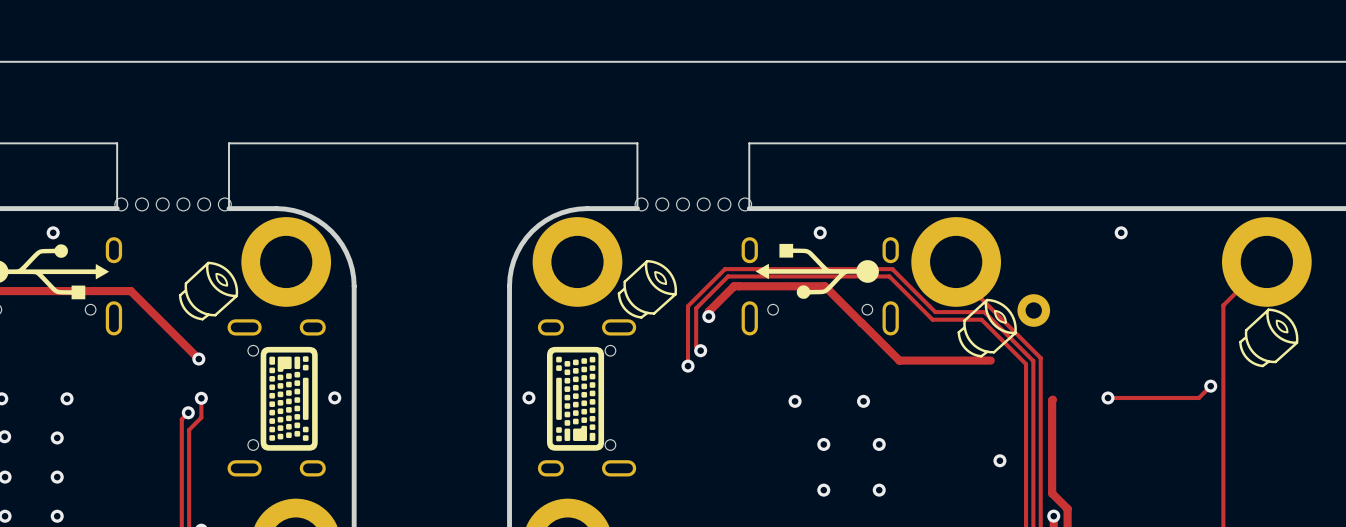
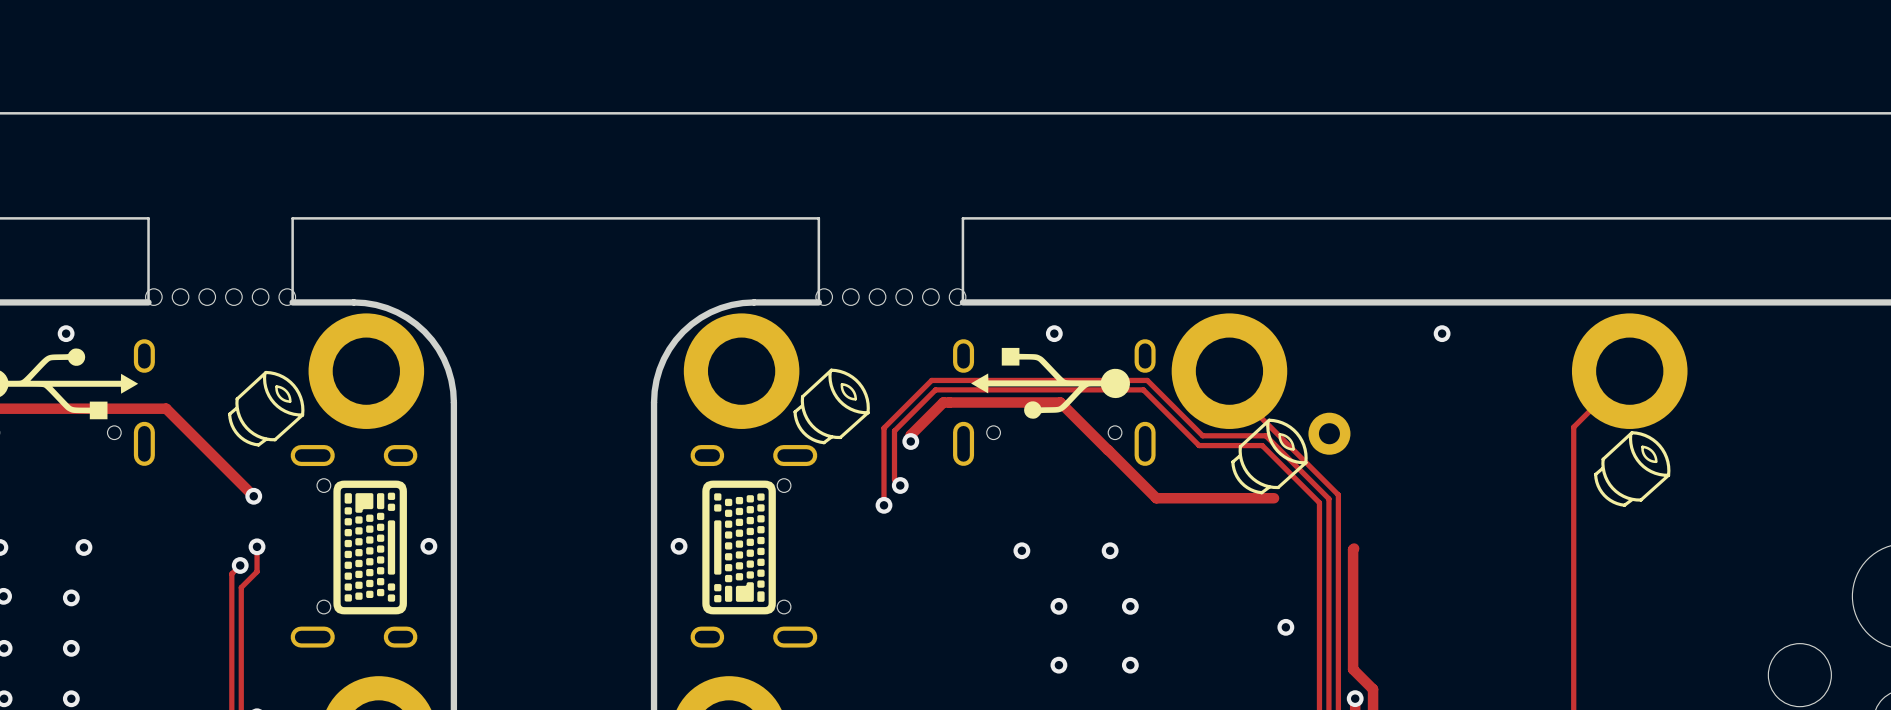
track: (1210, 386) (1198, 397) (1107, 397) -> none
via: (1210, 386) -> none
via: (1107, 397) -> none

